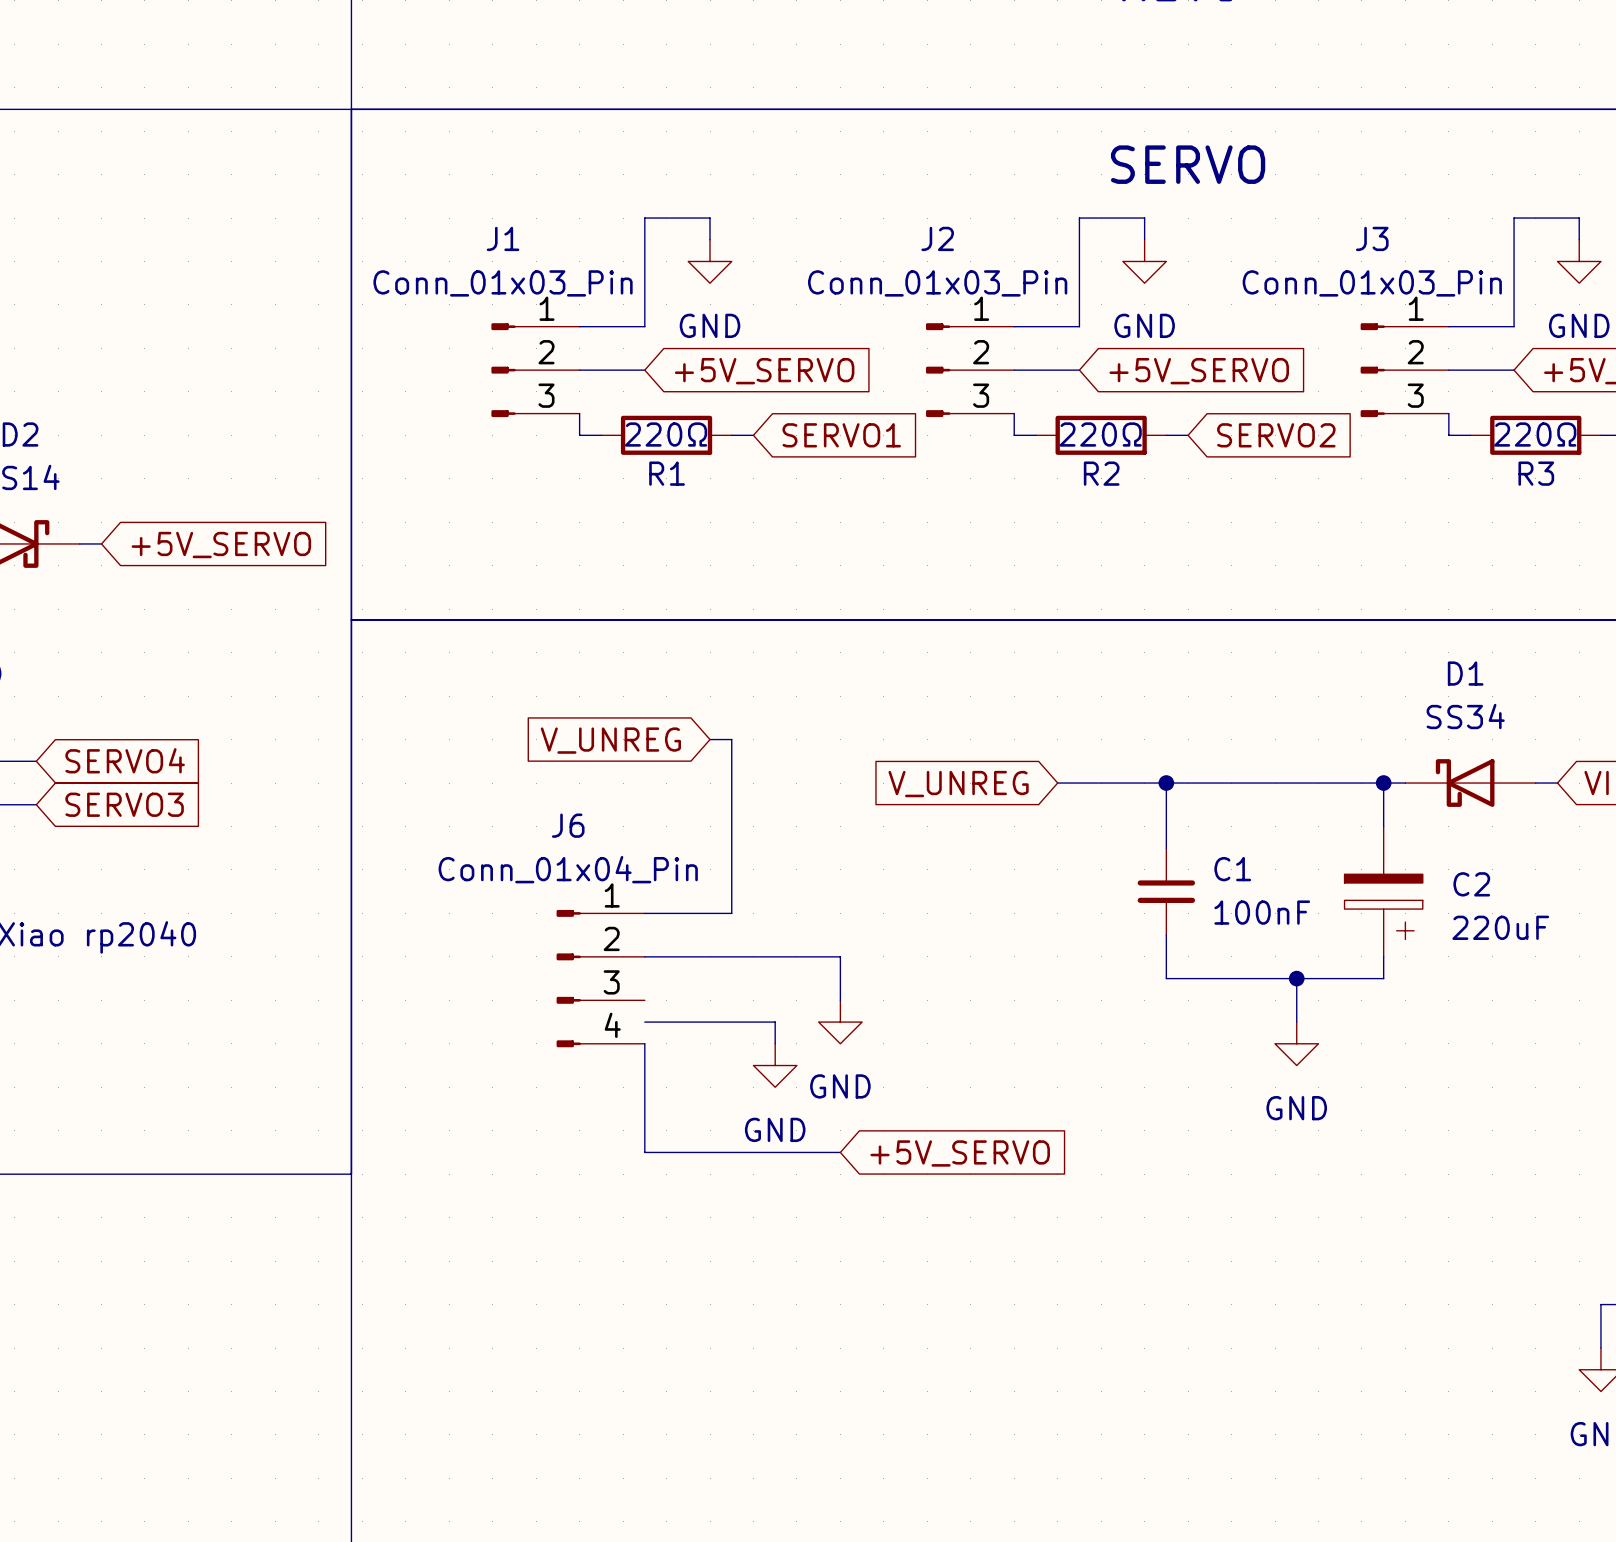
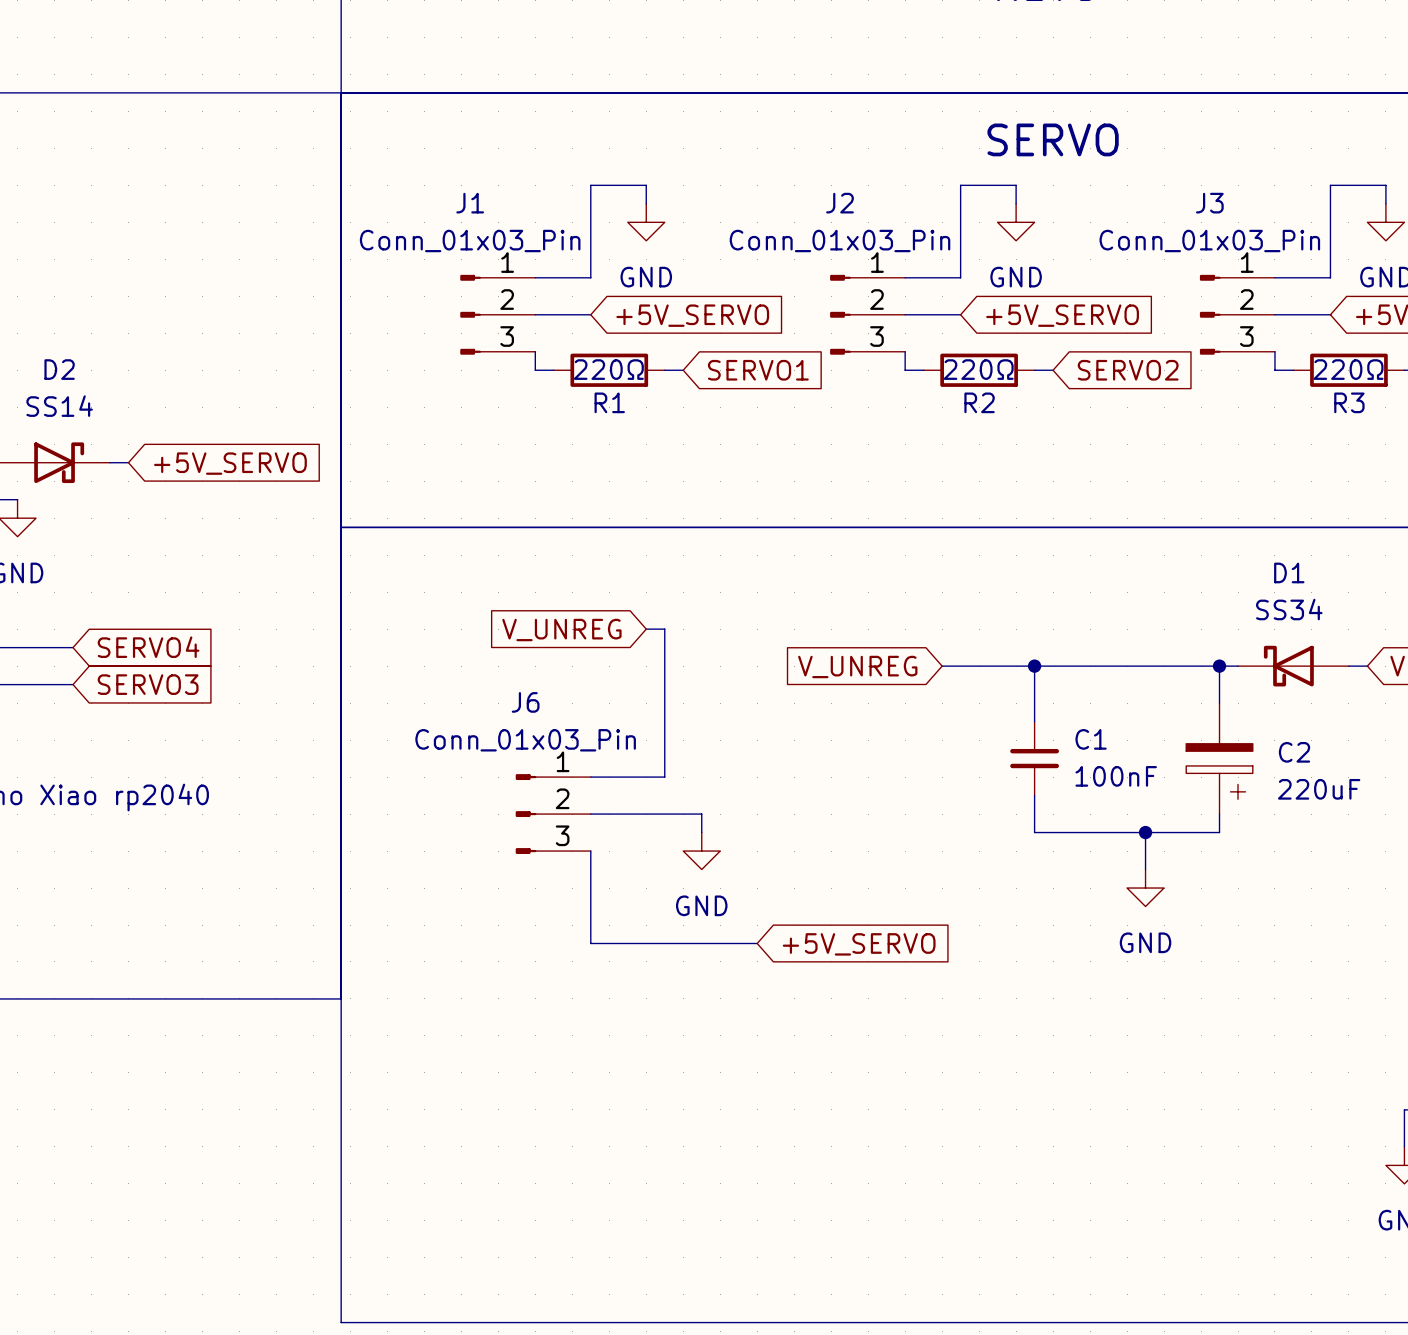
J6 value: Conn_01x04_Pin (568, 869) -> Conn_01x03_Pin (525, 740)
J6 symbol: [556, 909, 645, 1048] -> [515, 774, 591, 854]
wire: (775, 956) (840, 956) (840, 1000) -> (701, 814) (701, 832)
wire: none -> (590, 851) (590, 888)
power symbol: none -> GND (701, 851)
wire: (644, 1022) (775, 1022) (775, 1043) -> none
power symbol: GND (840, 1022) -> none
power symbol: GND (775, 1065) -> none
wire: (644, 1108) (644, 1152) (840, 1152) -> (590, 943) (757, 943)
global label position: +5V_SERVO (960, 1153) -> +5V_SERVO (859, 944)

